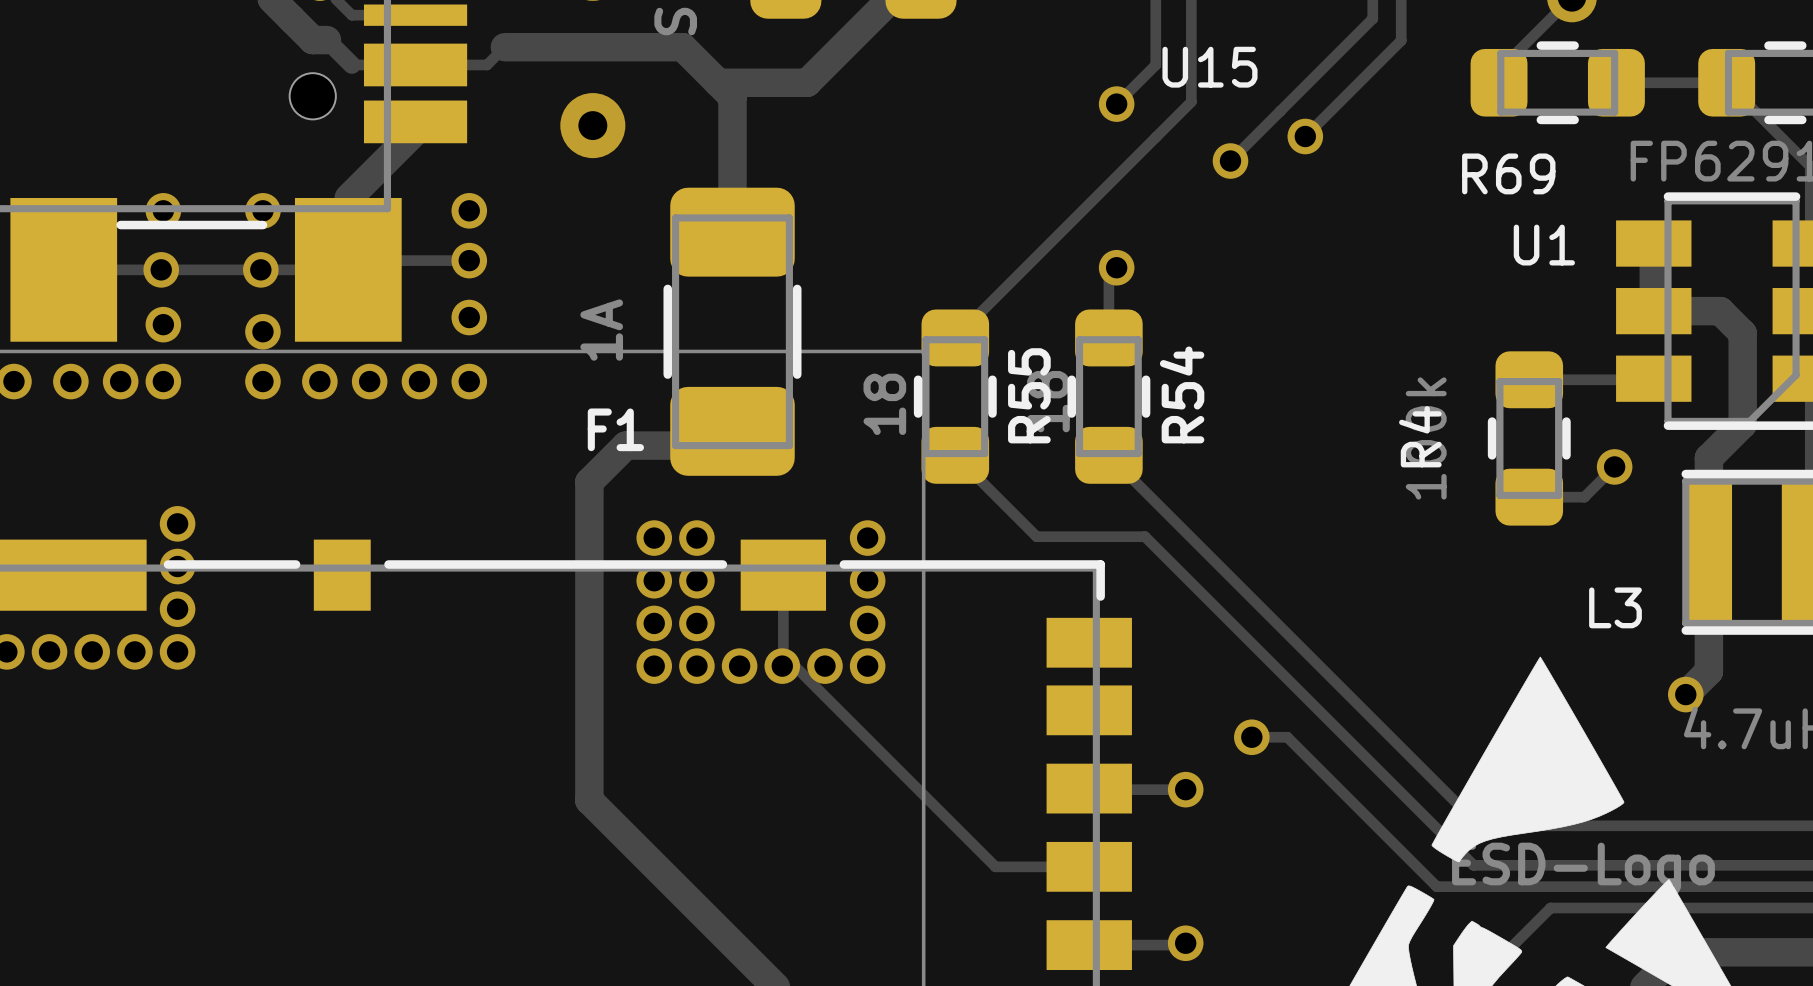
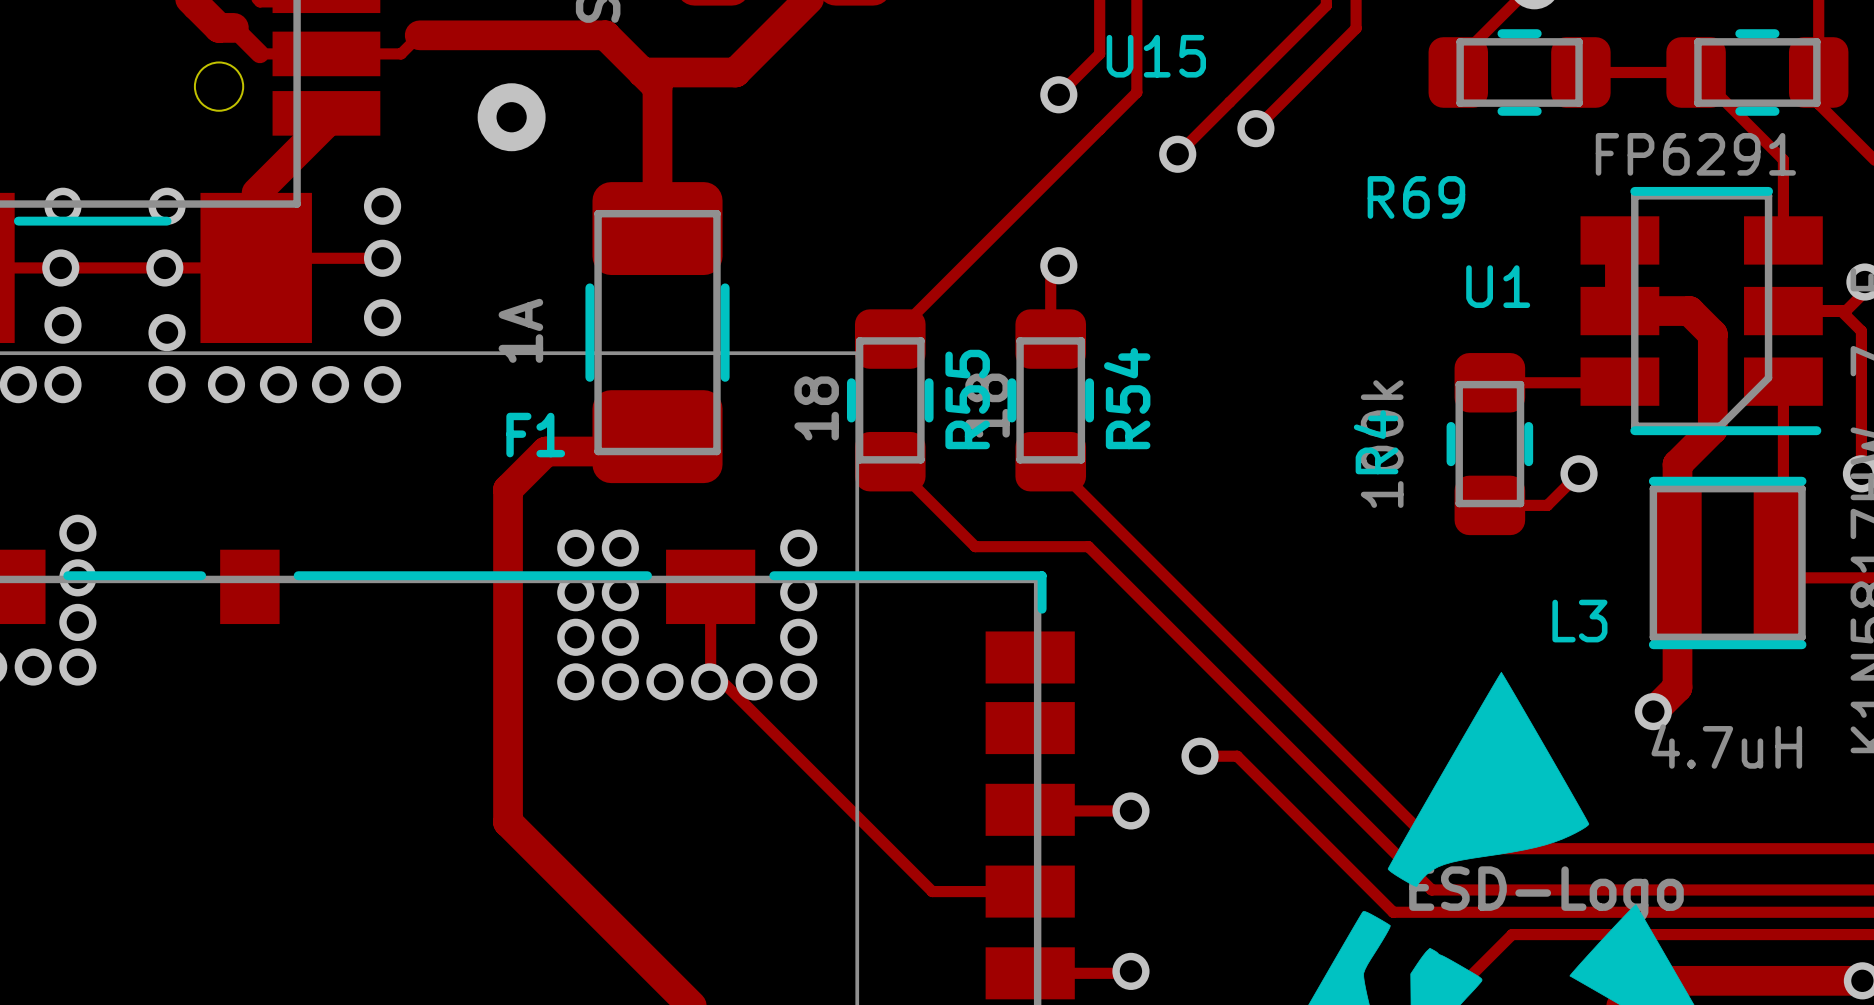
R69 name position: R69 (1508, 173) -> R69 (1416, 197)
U1 name position: U1 (1544, 245) -> U1 (1498, 286)

